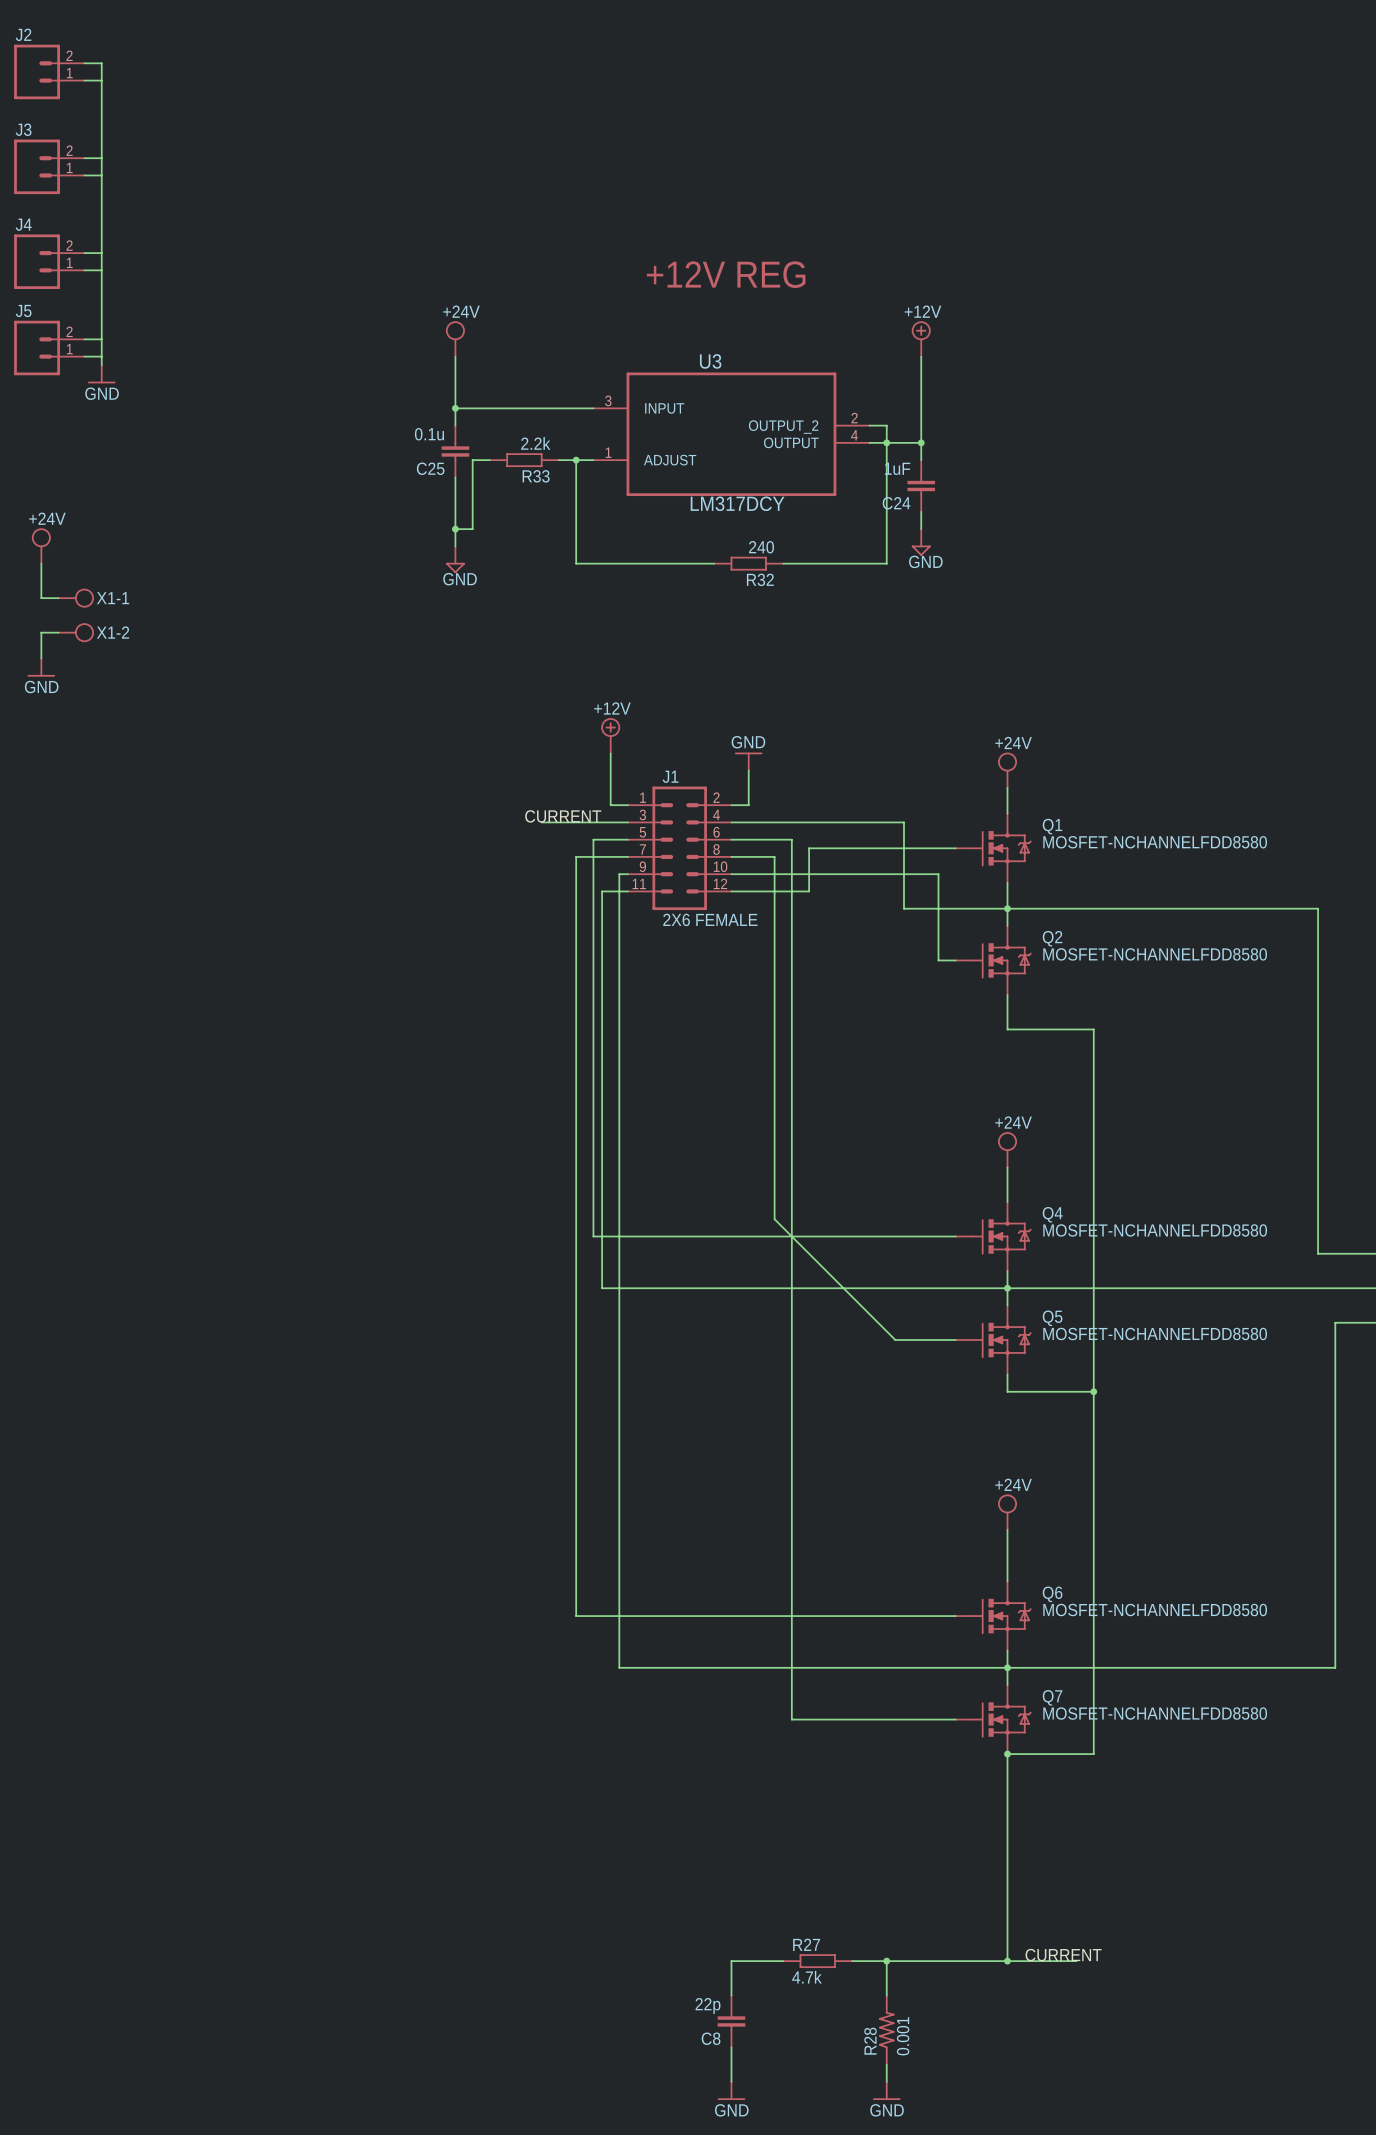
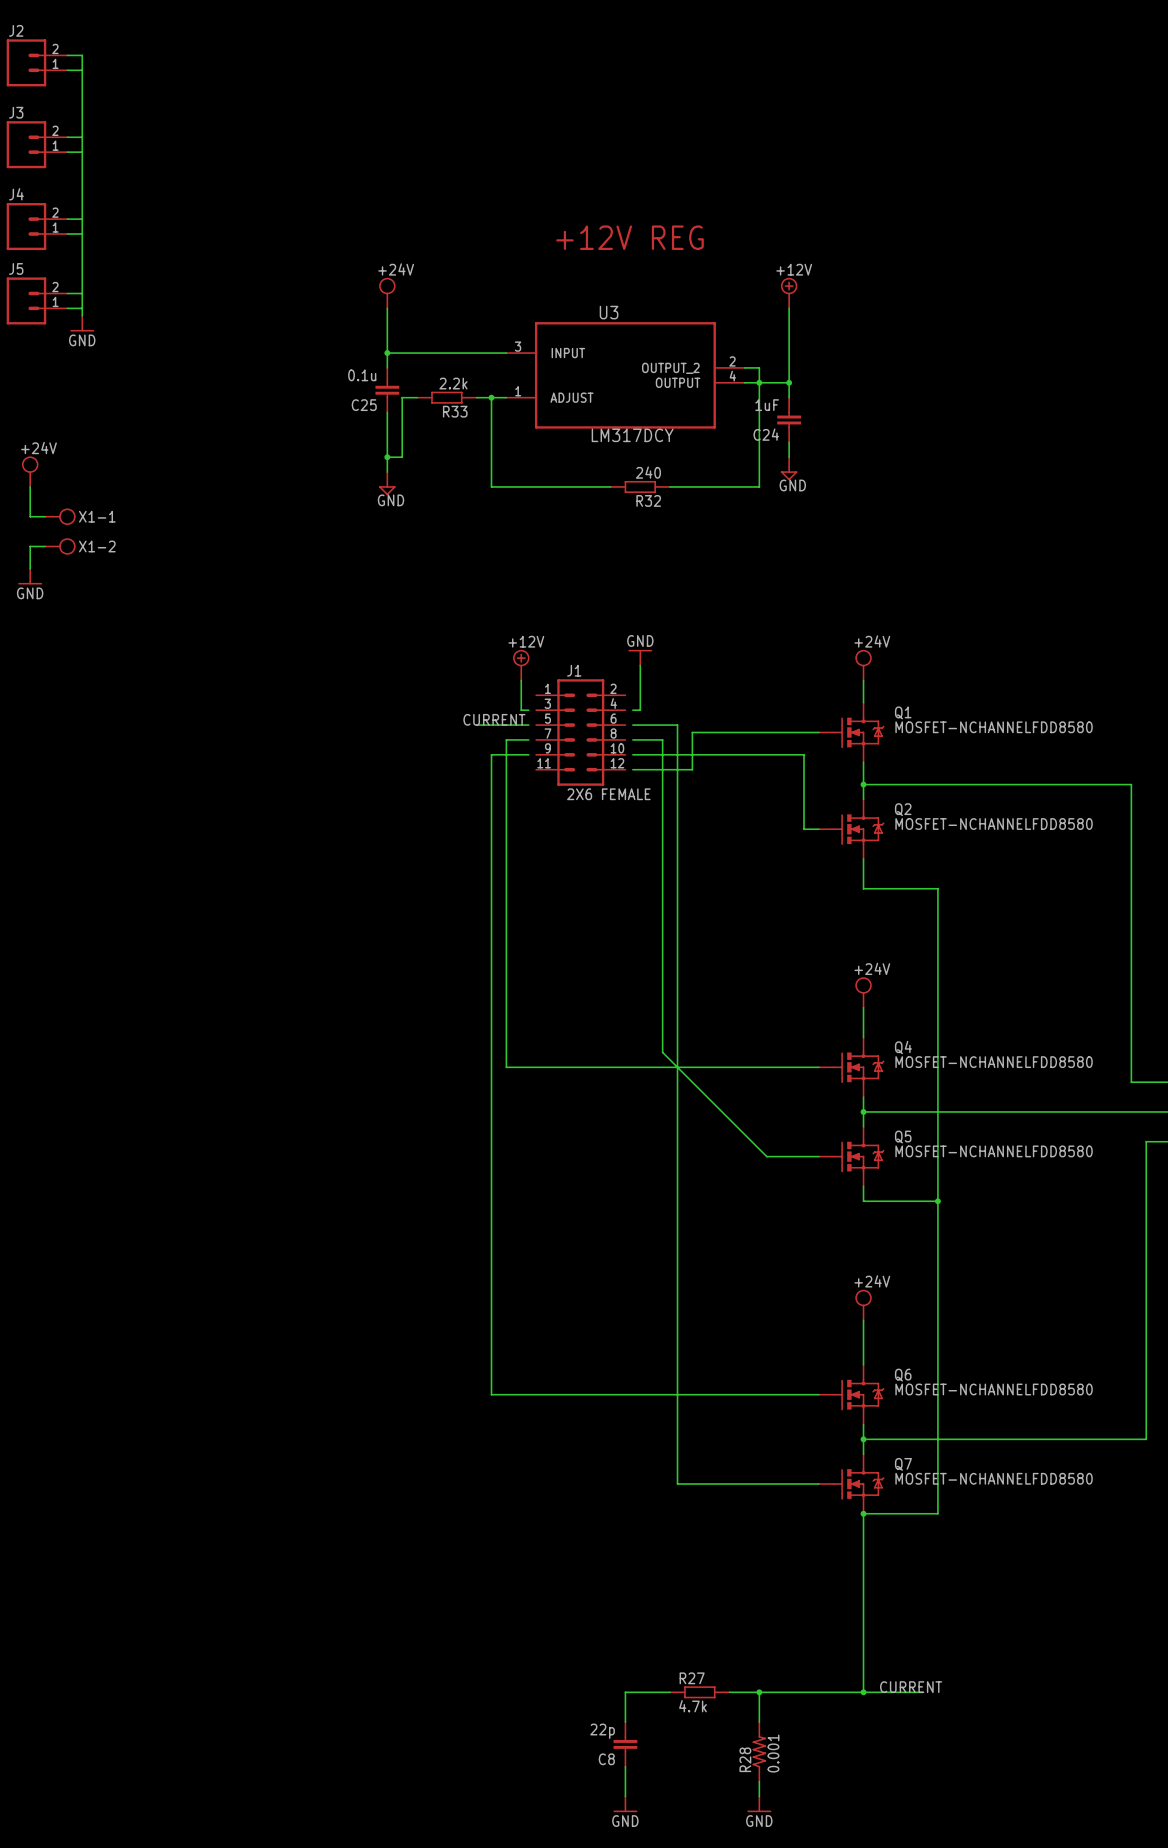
power symbol position: +12V (610, 735) -> +12V (521, 665)
wire: (610, 805) (627, 805) -> (521, 695) (521, 710)
wire: (731, 805) (748, 805) -> (640, 710) (640, 695)
label position: CURRENT (563, 816) -> CURRENT (494, 719)
wire: (541, 822) (610, 822) -> none
wire: (619, 822) (627, 822) -> none
wire: (731, 822) (740, 822) -> none
wire: (748, 822) (903, 822) (903, 908) (1007, 908) -> none
wire: (593, 839) (593, 856) (576, 856) (576, 874) -> (506, 725) (476, 725)
wire: (619, 839) (627, 839) -> none
wire: (731, 839) (740, 839) -> none
wire: (619, 856) (627, 856) -> none
wire: (731, 856) (740, 856) -> none
wire: none -> (491, 754) (528, 754)
wire: (627, 874) (619, 874) (619, 1667) (1007, 1667) -> none
wire: (731, 874) (740, 874) -> none
wire: (627, 891) (602, 891) (602, 1288) (1007, 1288) -> none
wire: (731, 891) (740, 891) -> none

